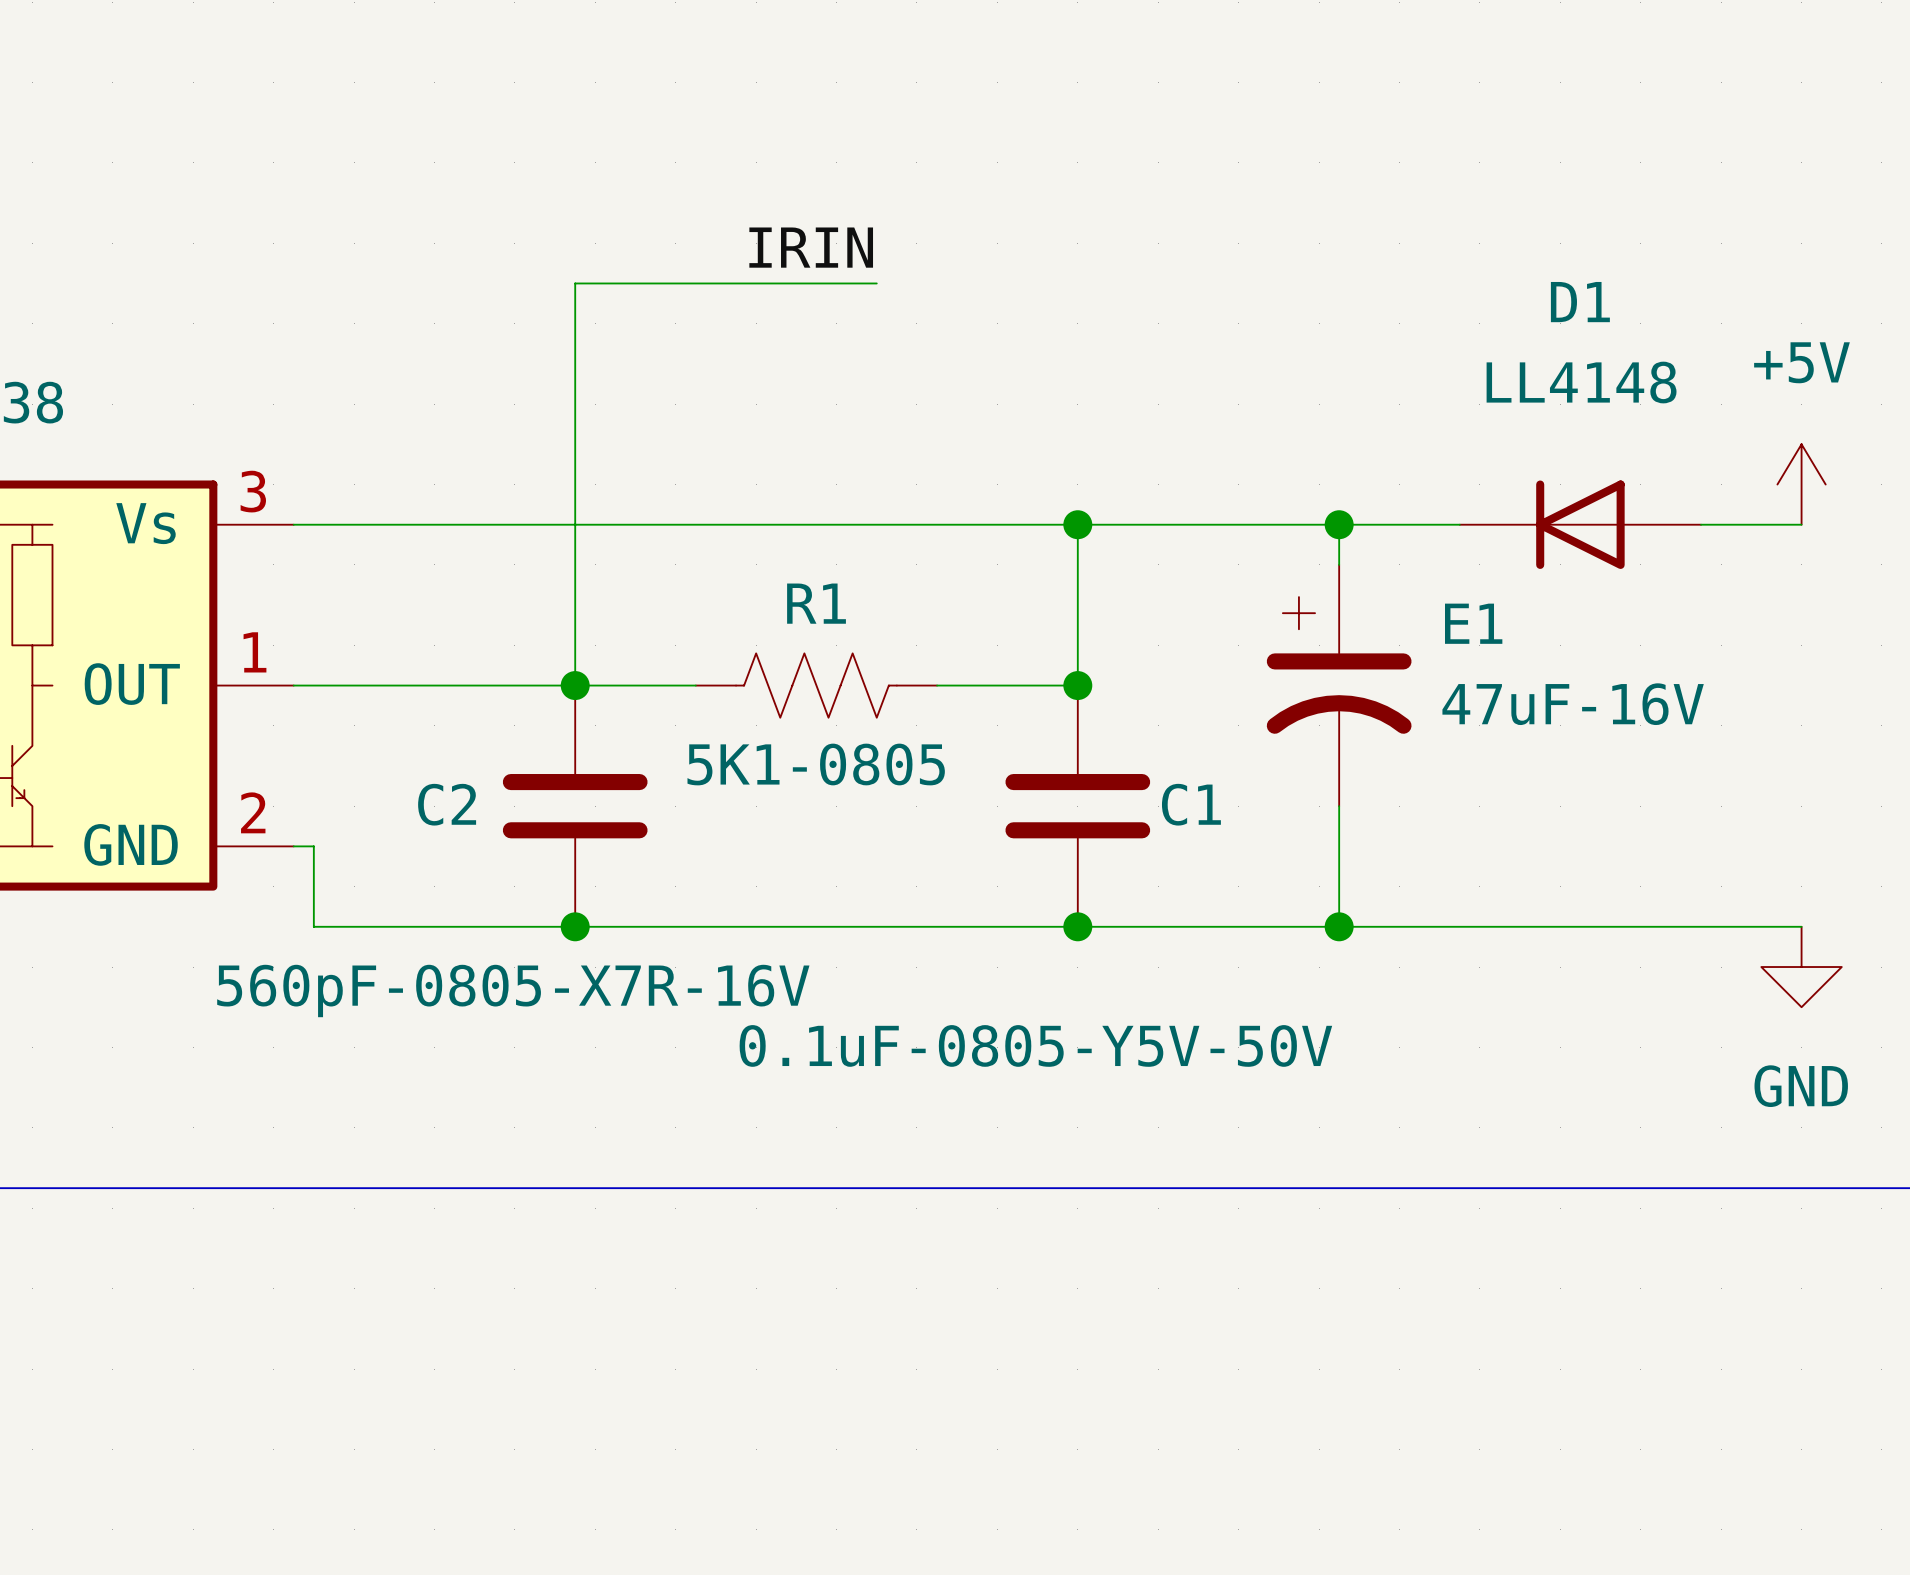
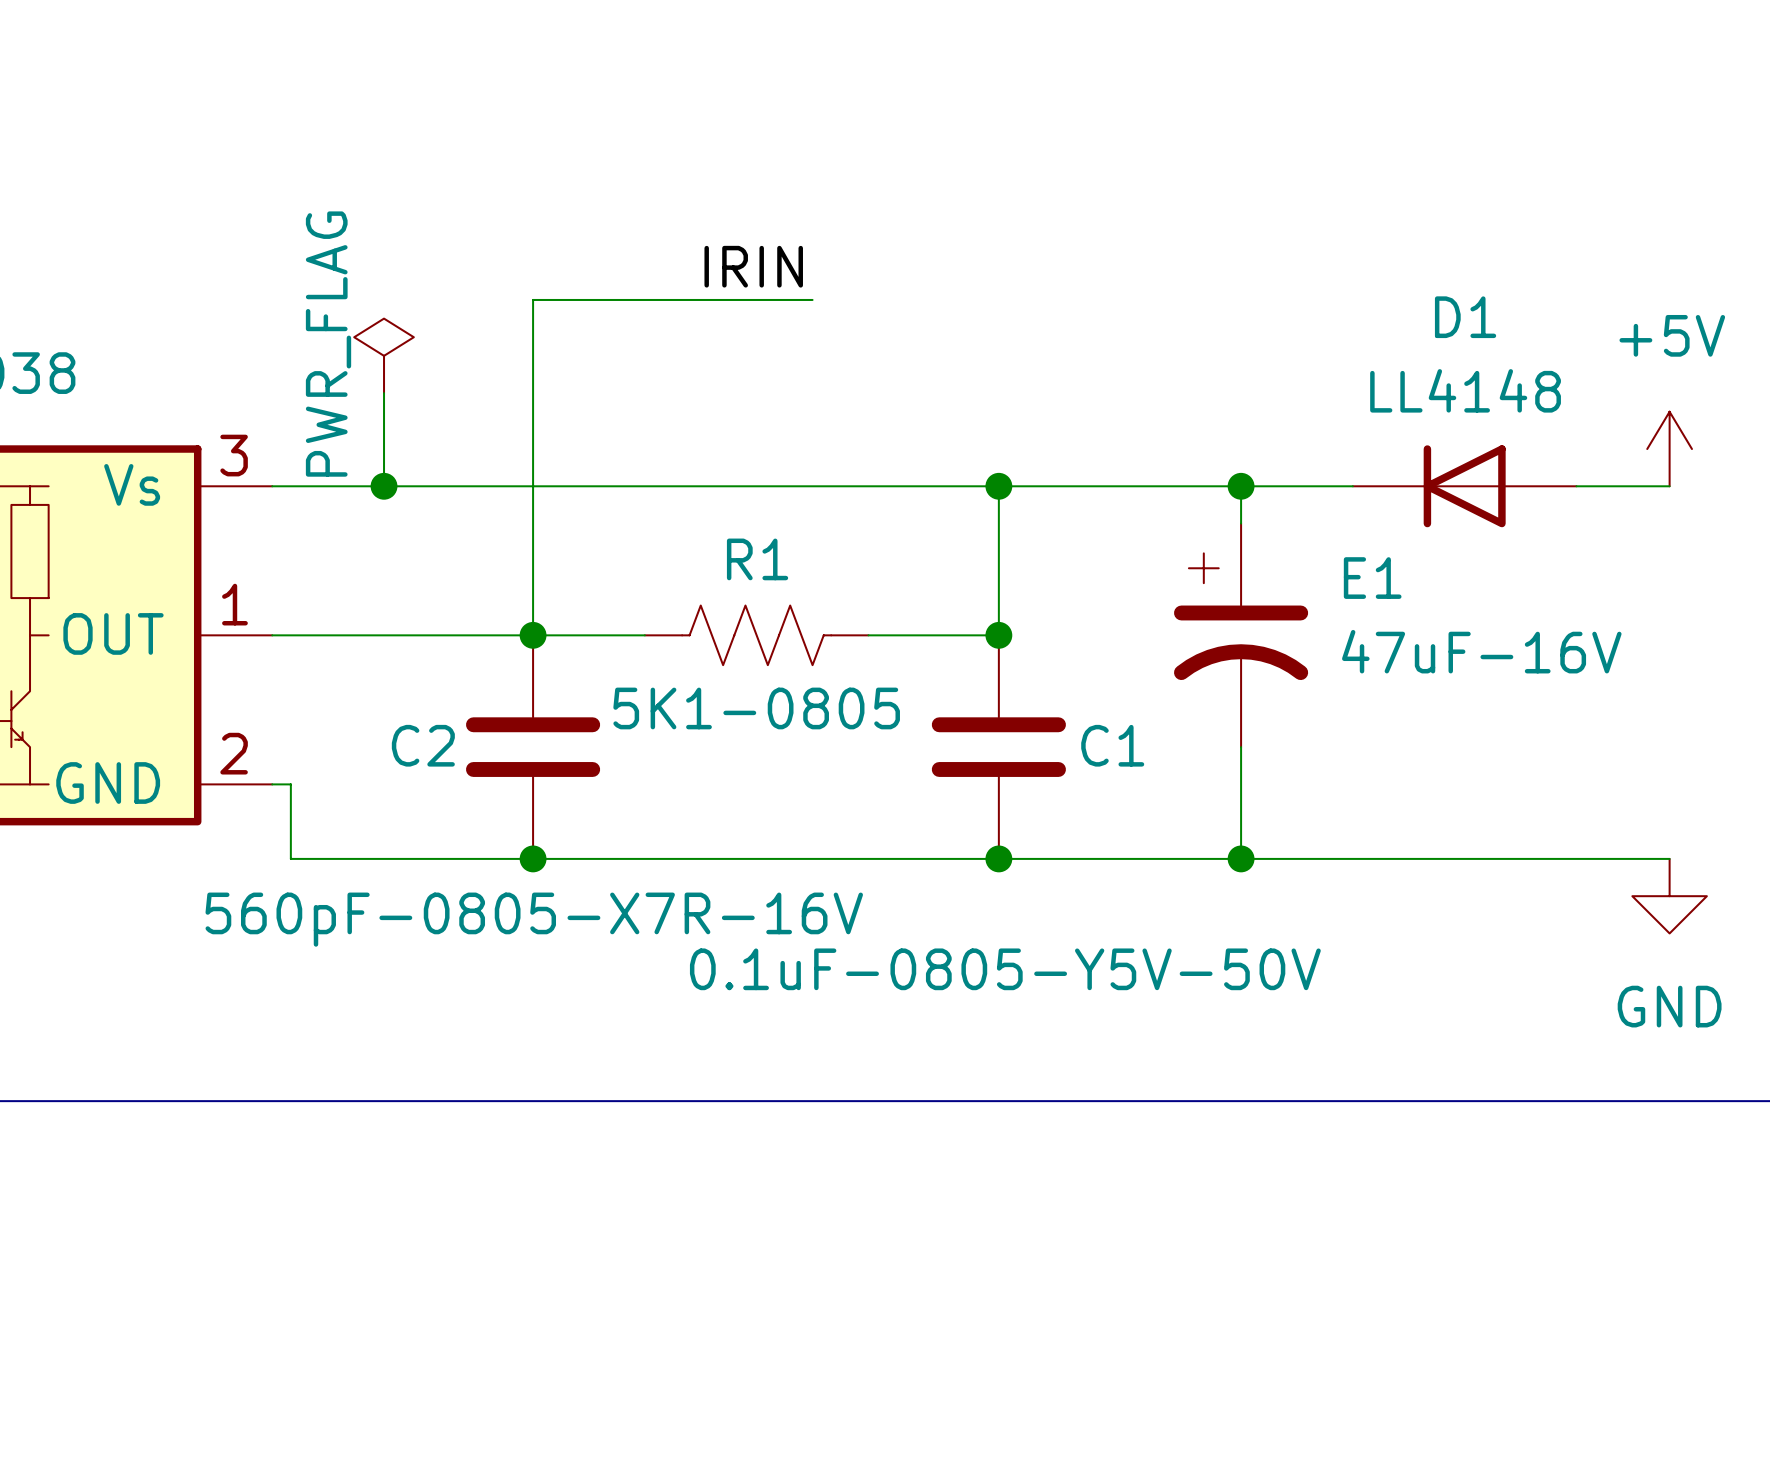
label position: IRIN (811, 247) -> IRIN (753, 266)
wire: (876, 283) (575, 283) (575, 323) -> (812, 299) (533, 299)
D1 name position: D1 (1580, 302) -> D1 (1465, 317)
D1 value position: LL4148 (1581, 382) -> LL4148 (1465, 390)
power symbol: none -> PWR_FLAG (384, 355)
wire: none -> (384, 393) (384, 486)
junction: none -> (384, 486)

